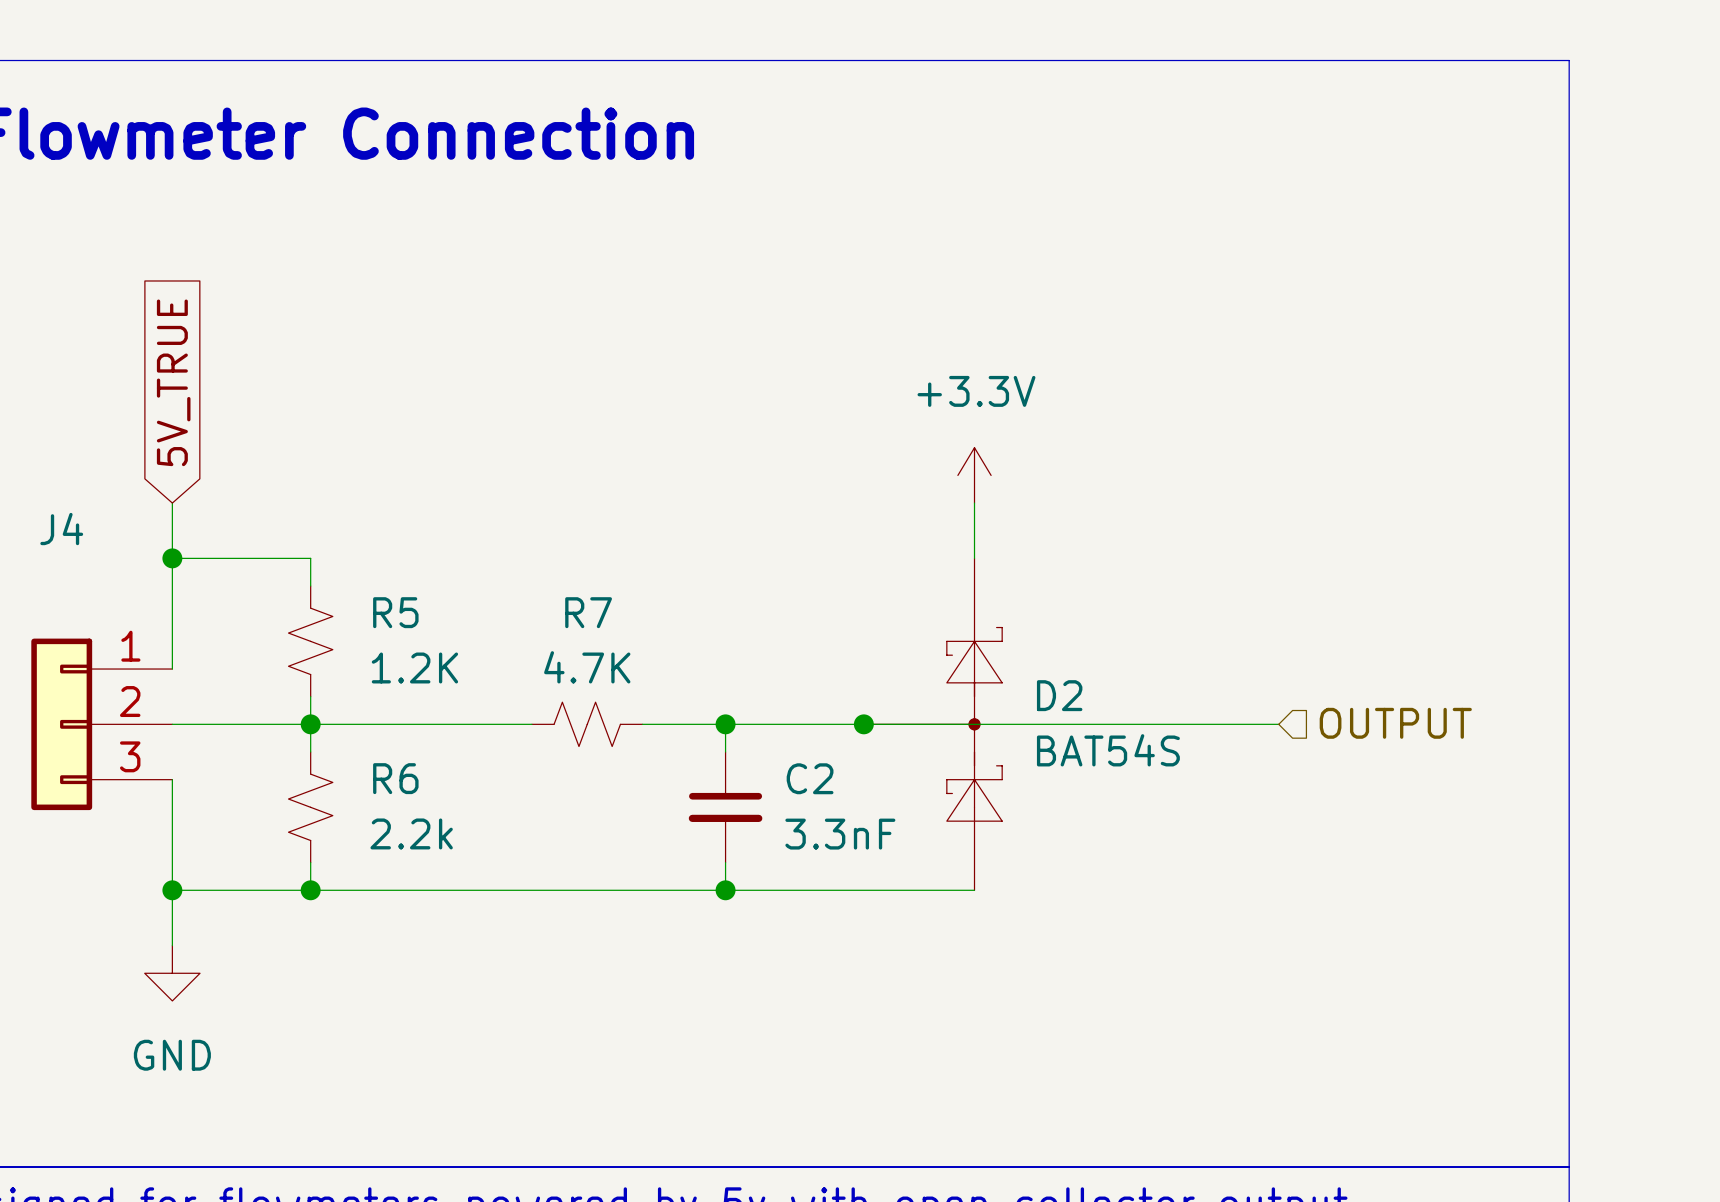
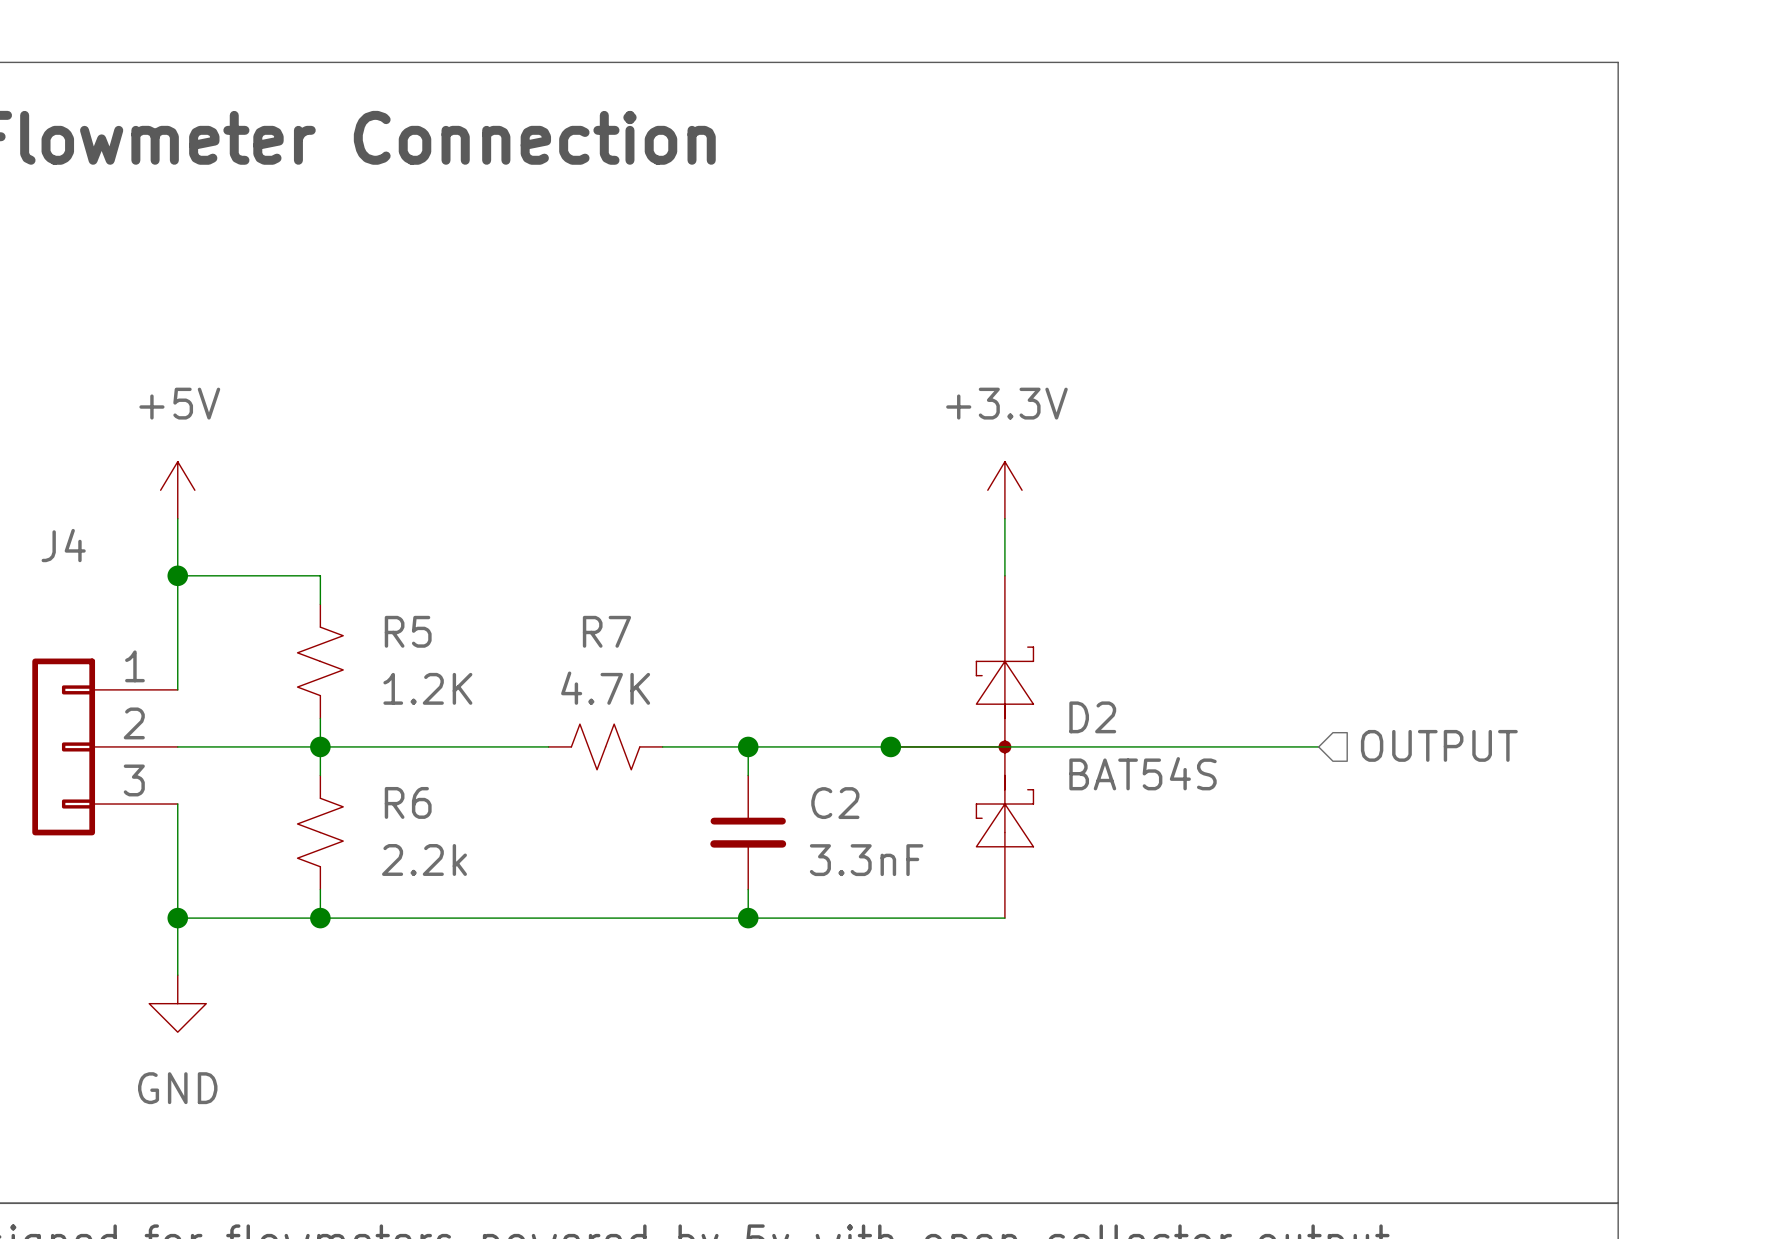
global label: 5V_TRUE (173, 382) -> none
power symbol: none -> +5V (177, 490)

